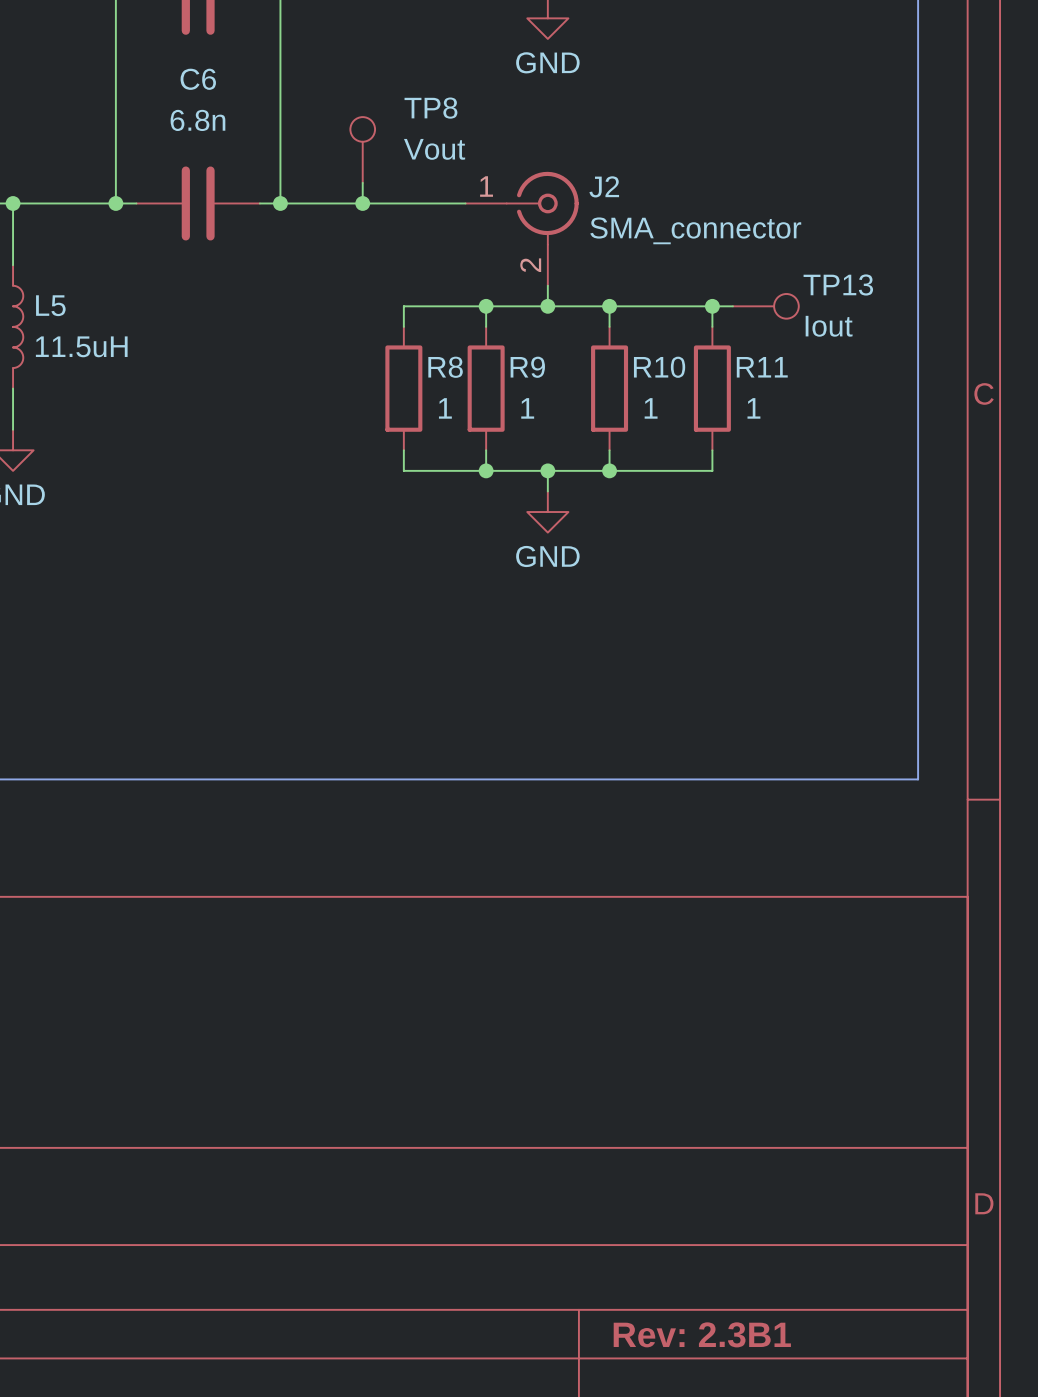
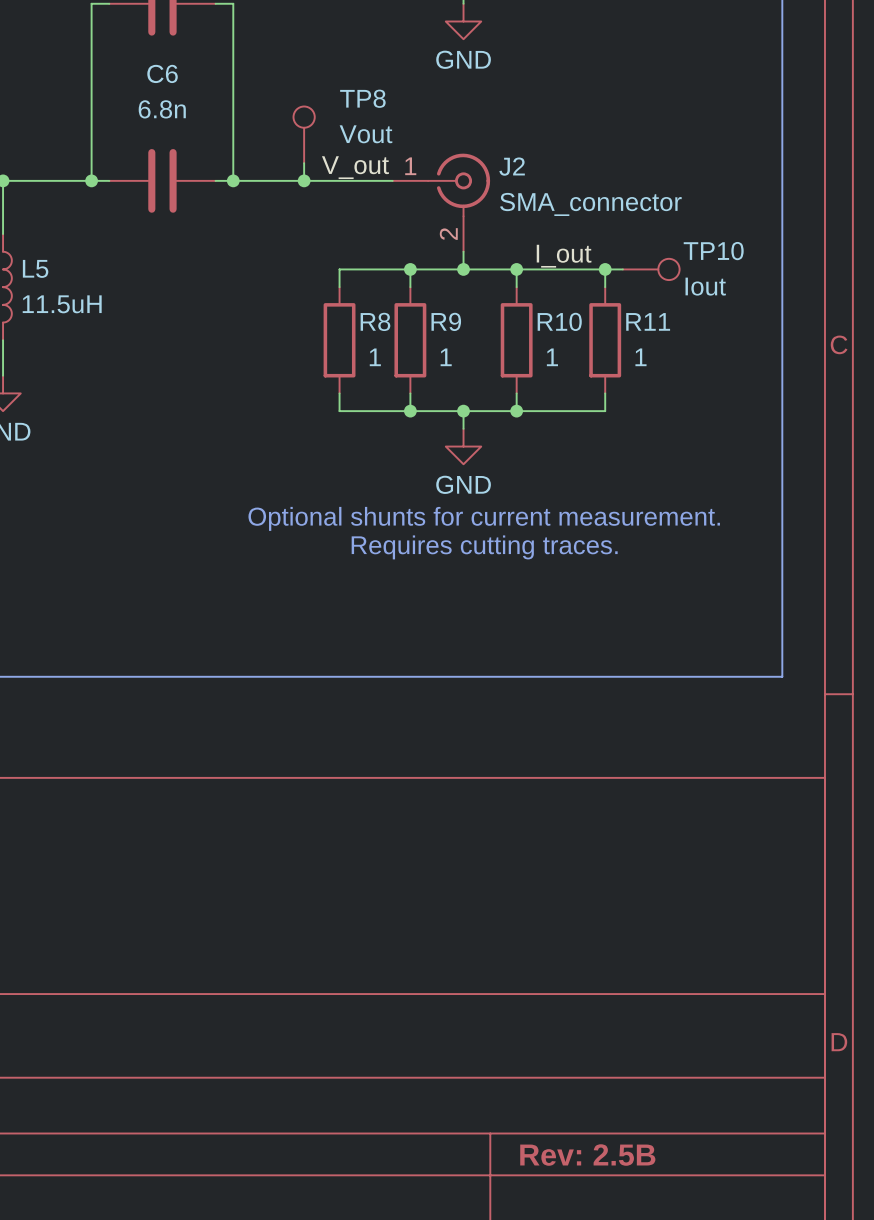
label: none -> V_out (355, 167)
TP13 name: TP13 (838, 284) -> TP10 (713, 251)
label: none -> I_out (564, 256)
text: none -> Optional shunts for current measurement. (484, 518)
text: none -> Requires cutting traces. (484, 547)
title block: Rev: 2.3B1 (702, 1334) -> Rev: 2.5B (587, 1155)

